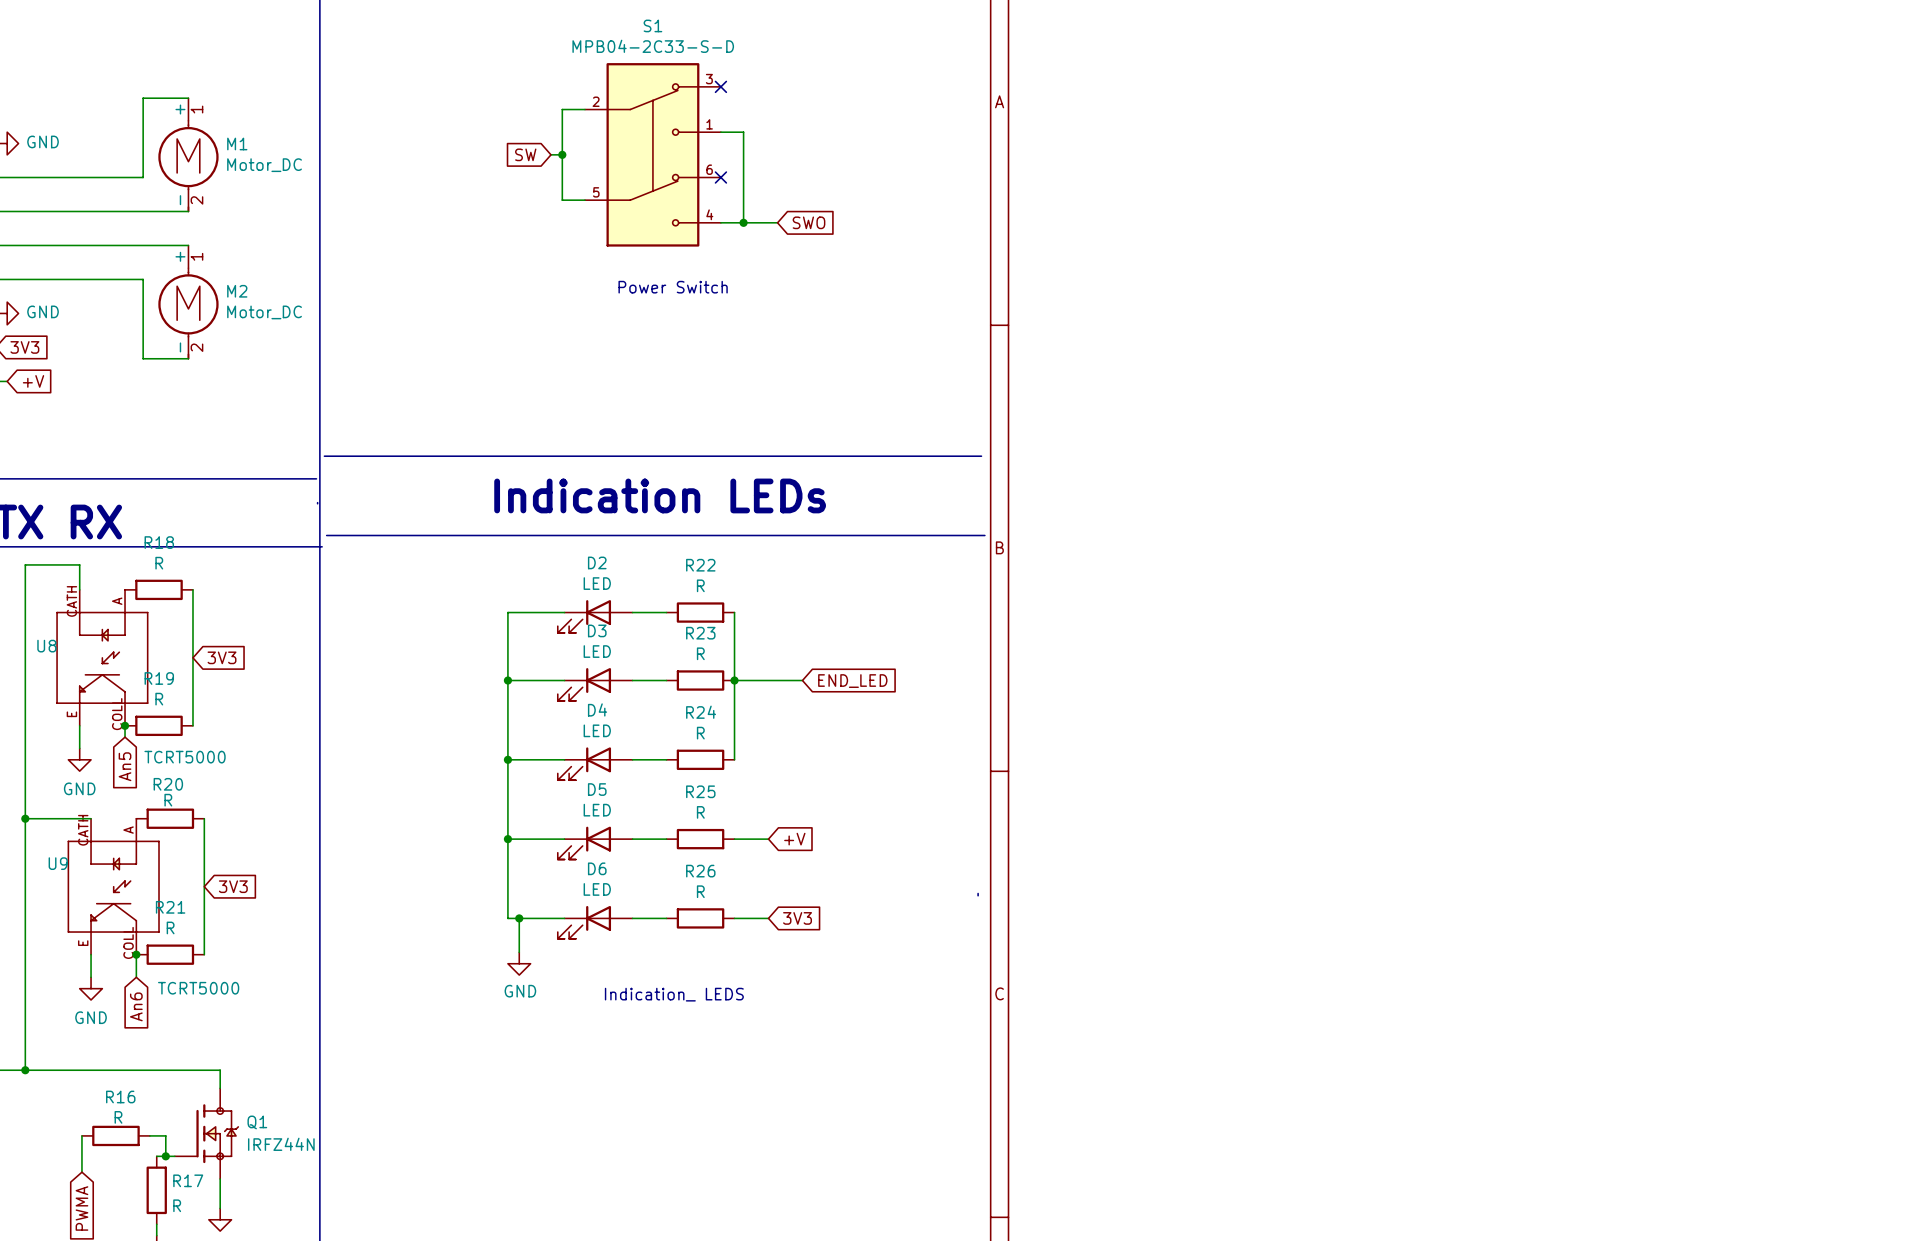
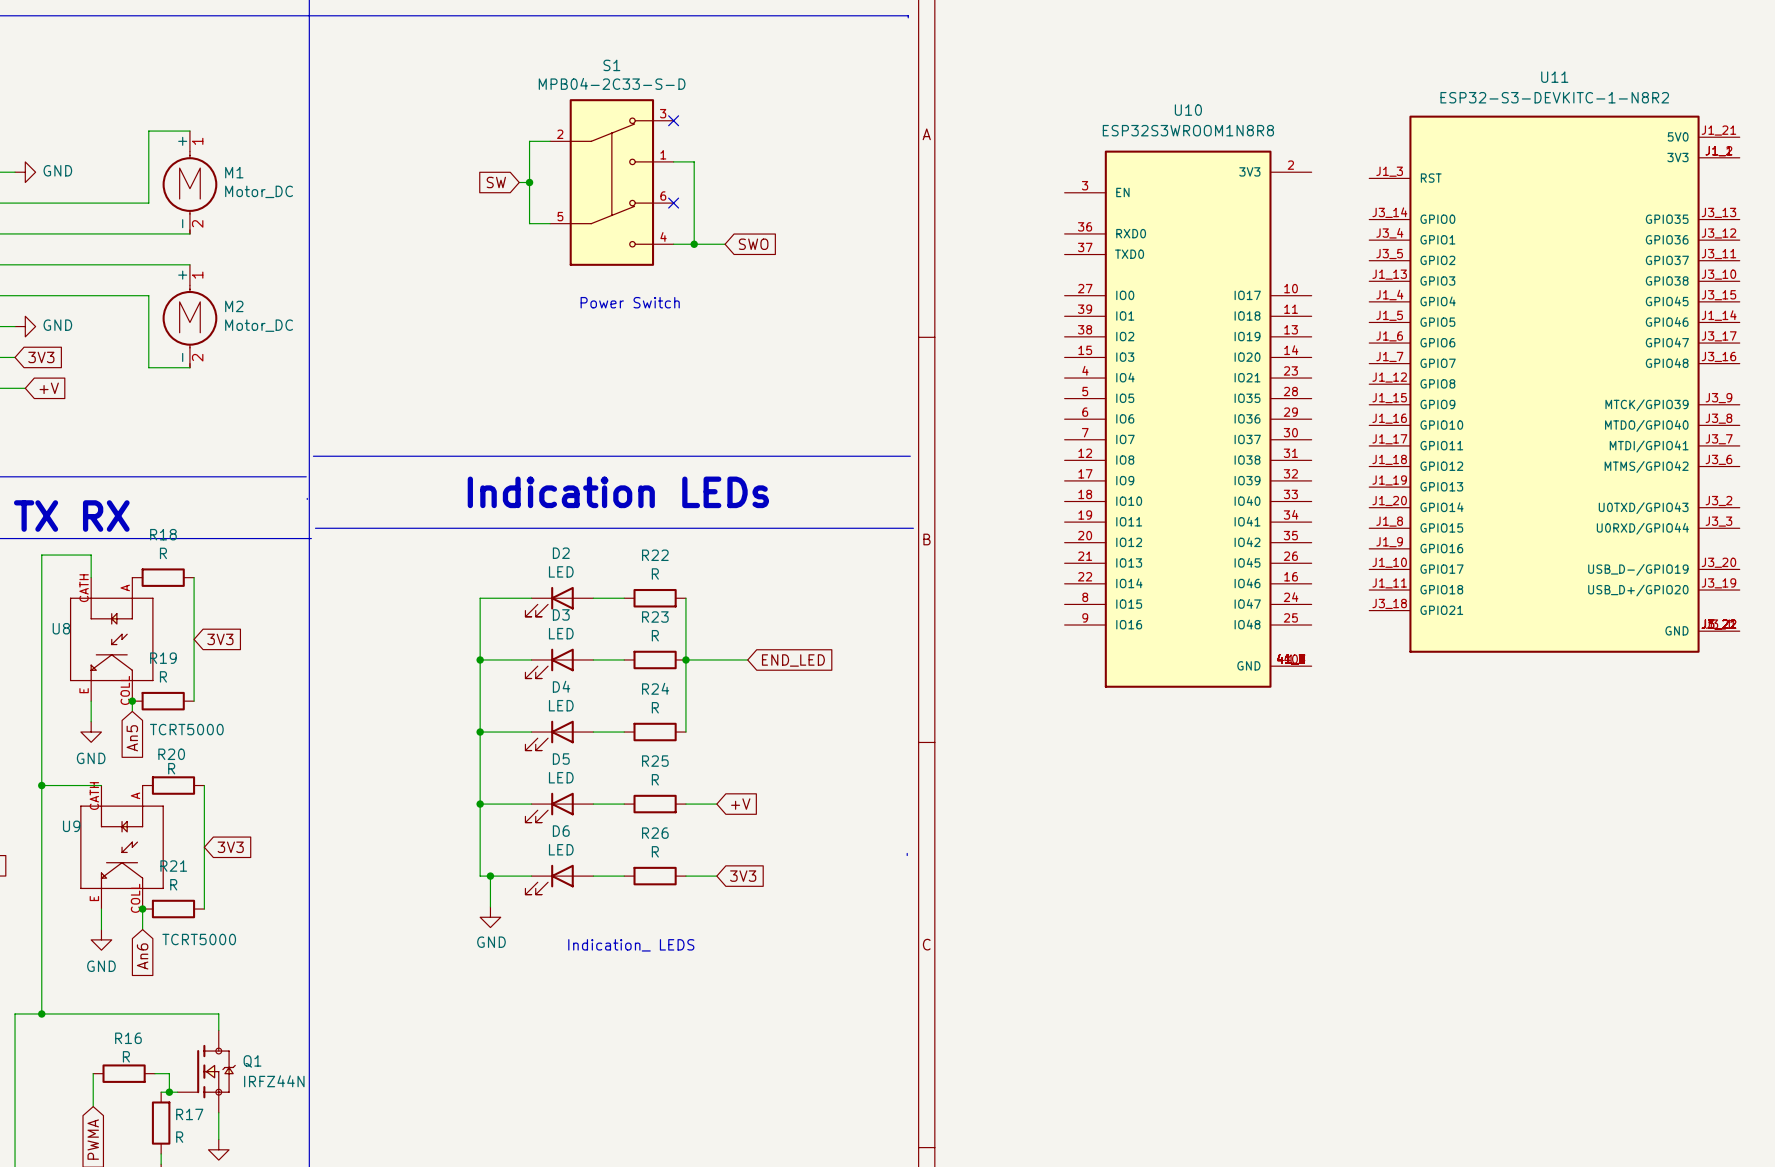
U11: none -> ESP32-S3-DEVKITC-1-N8R2 (1554, 384)
U10: none -> ESP32S3WROOM1N8R8 (1188, 419)

